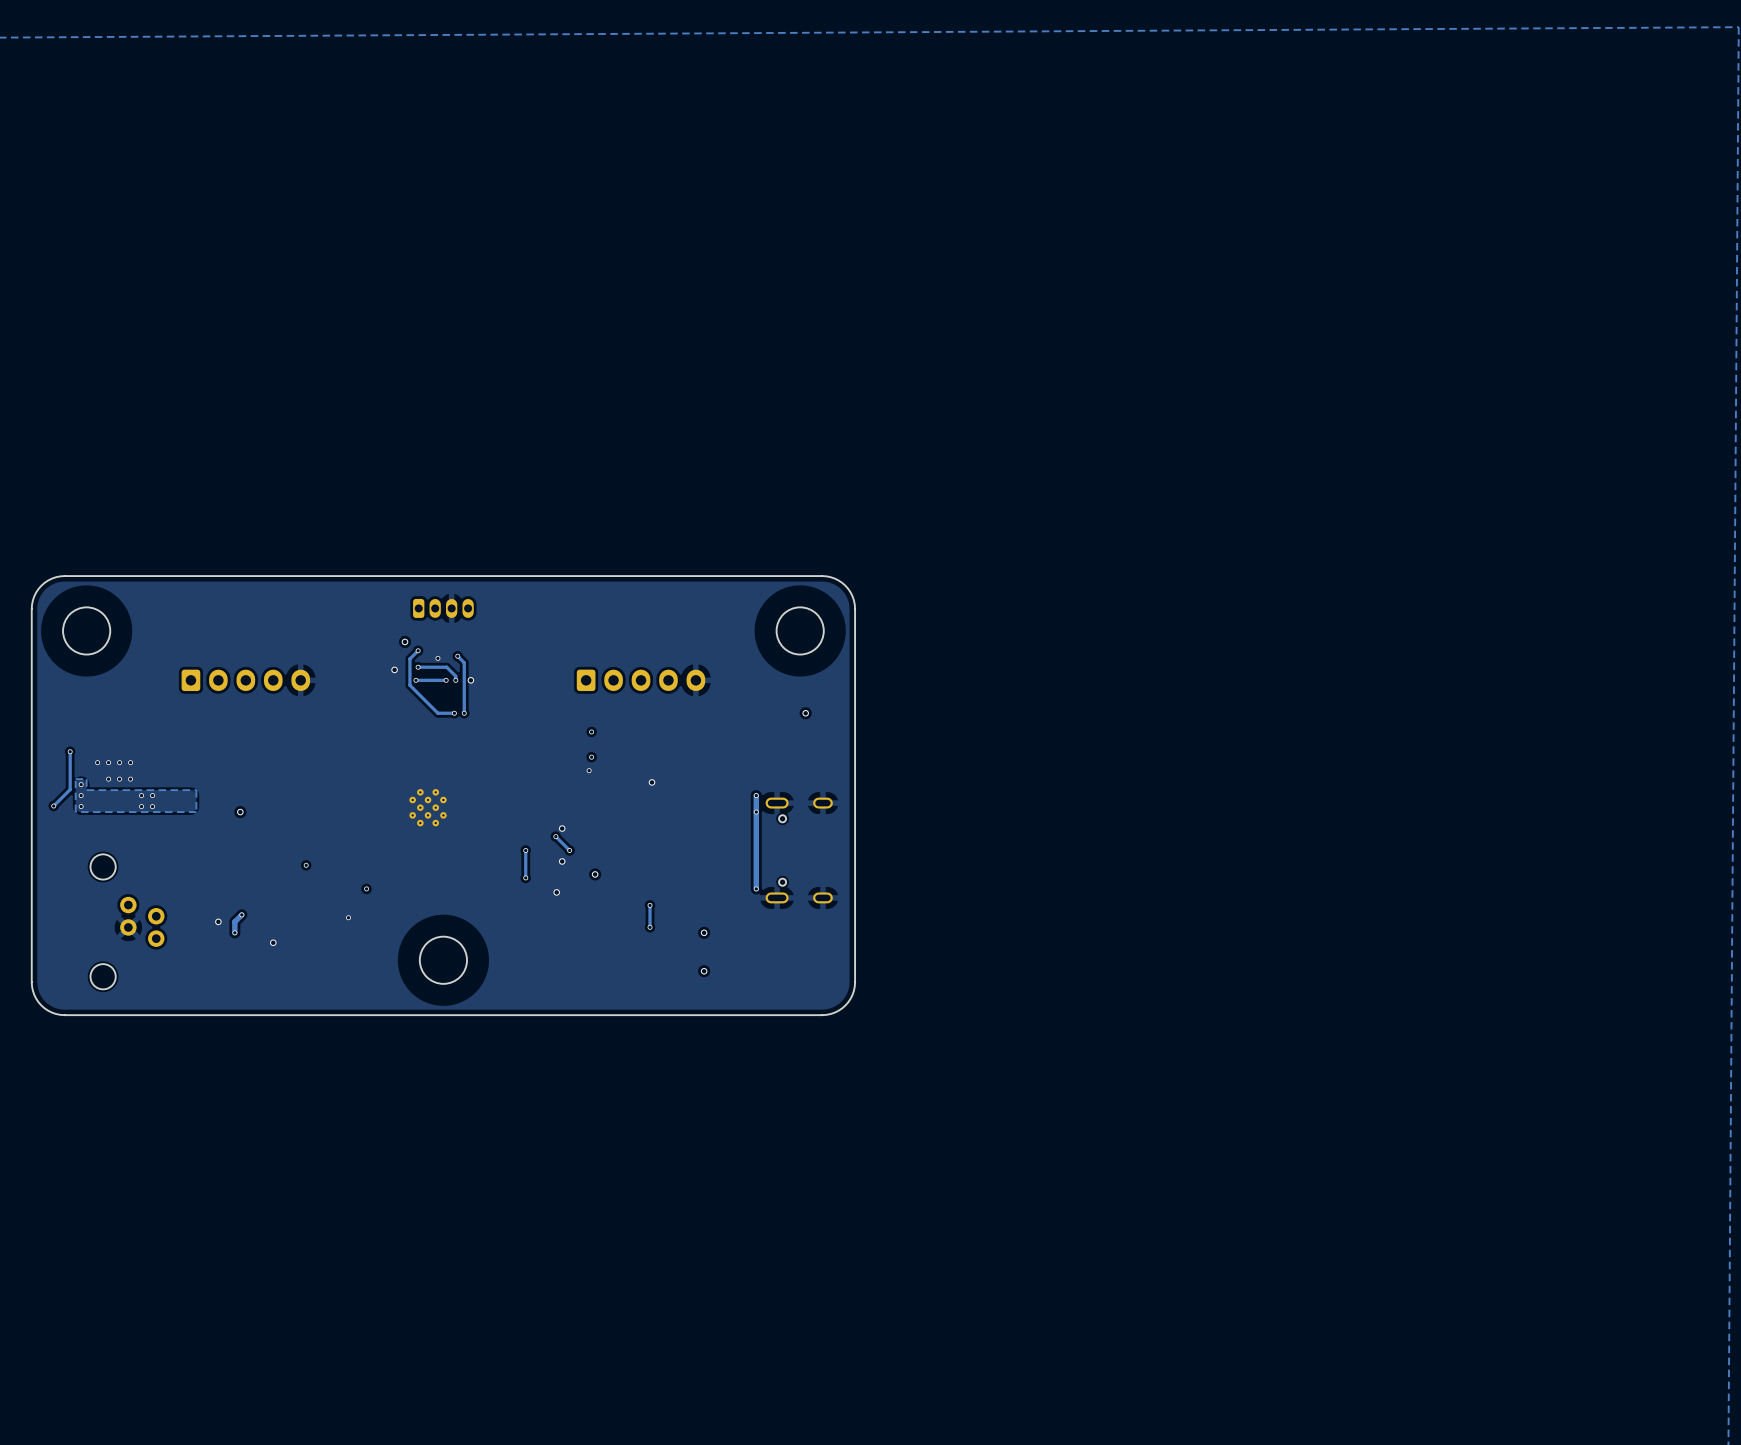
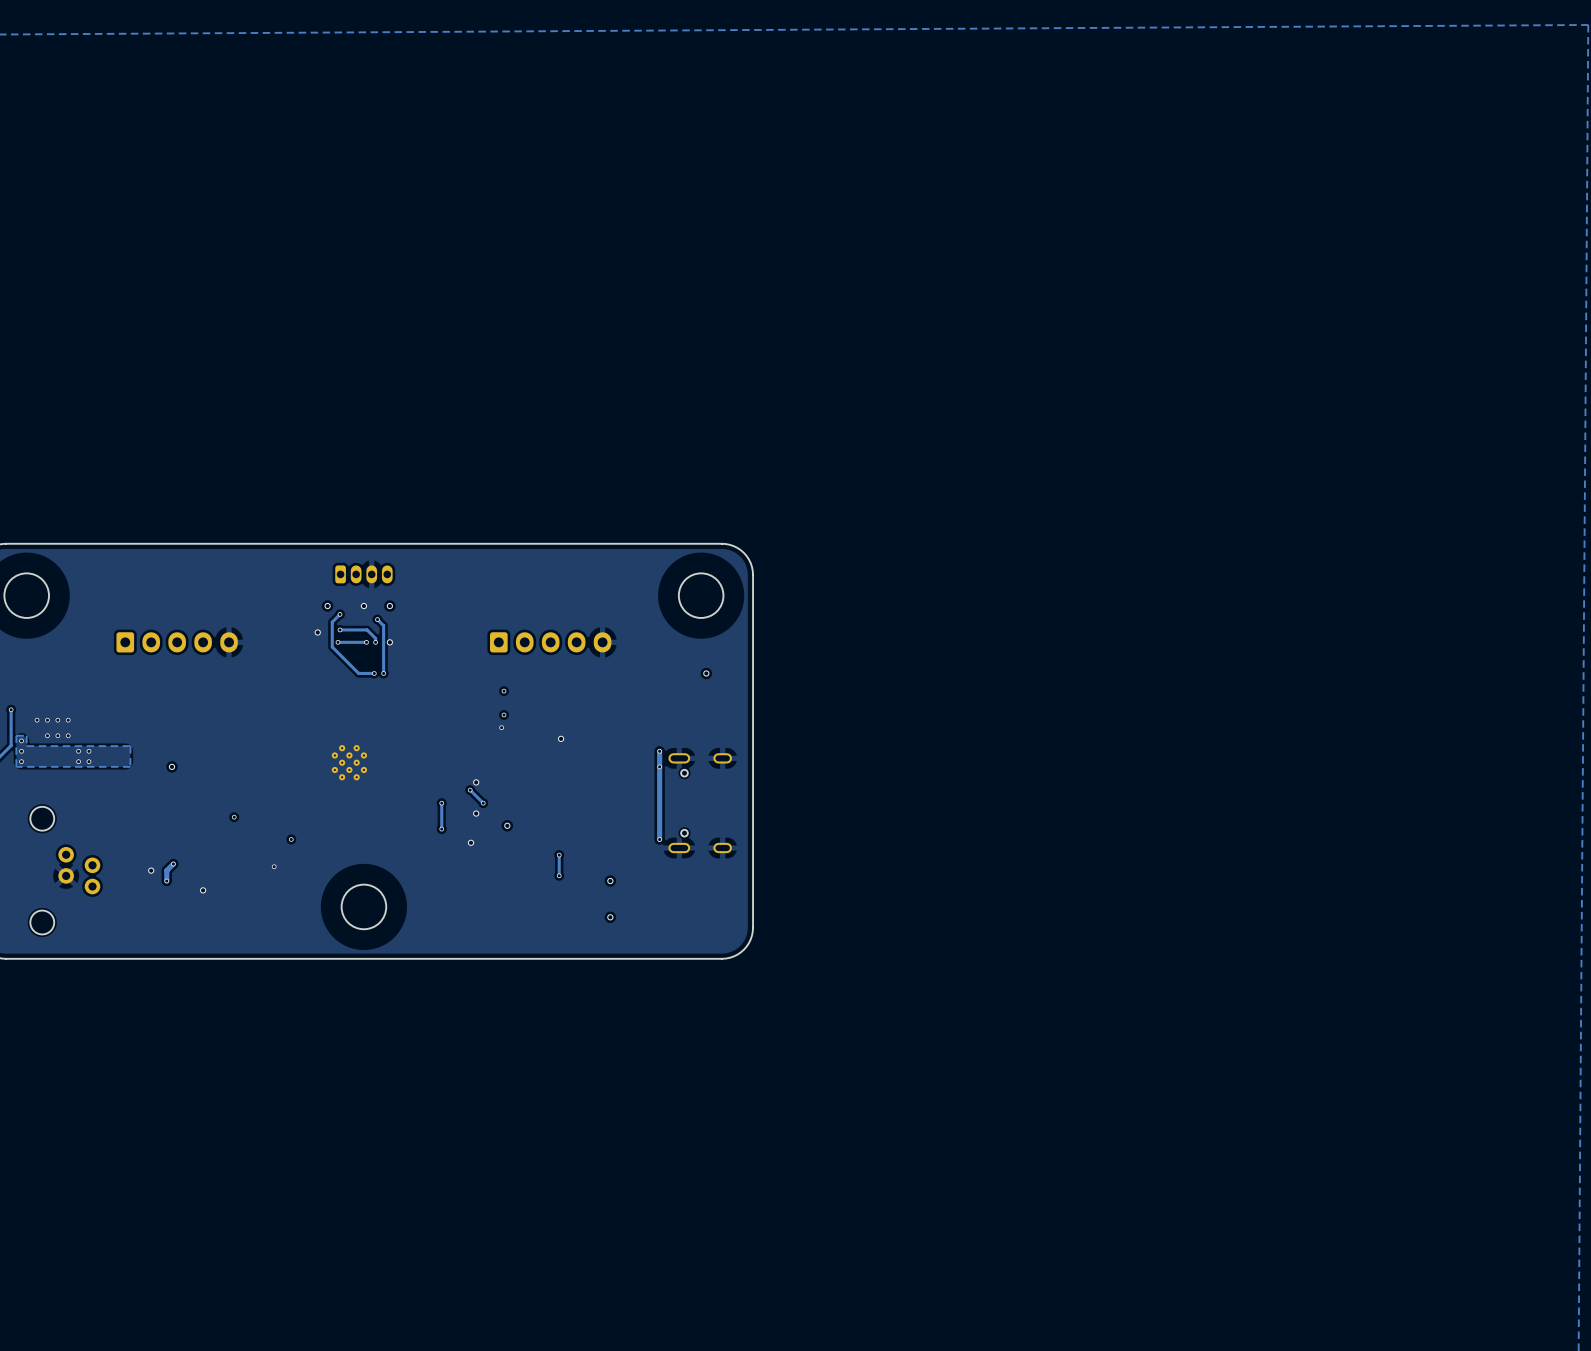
via: none -> (363, 606)
via: none -> (389, 606)
via: (437, 658) -> none

